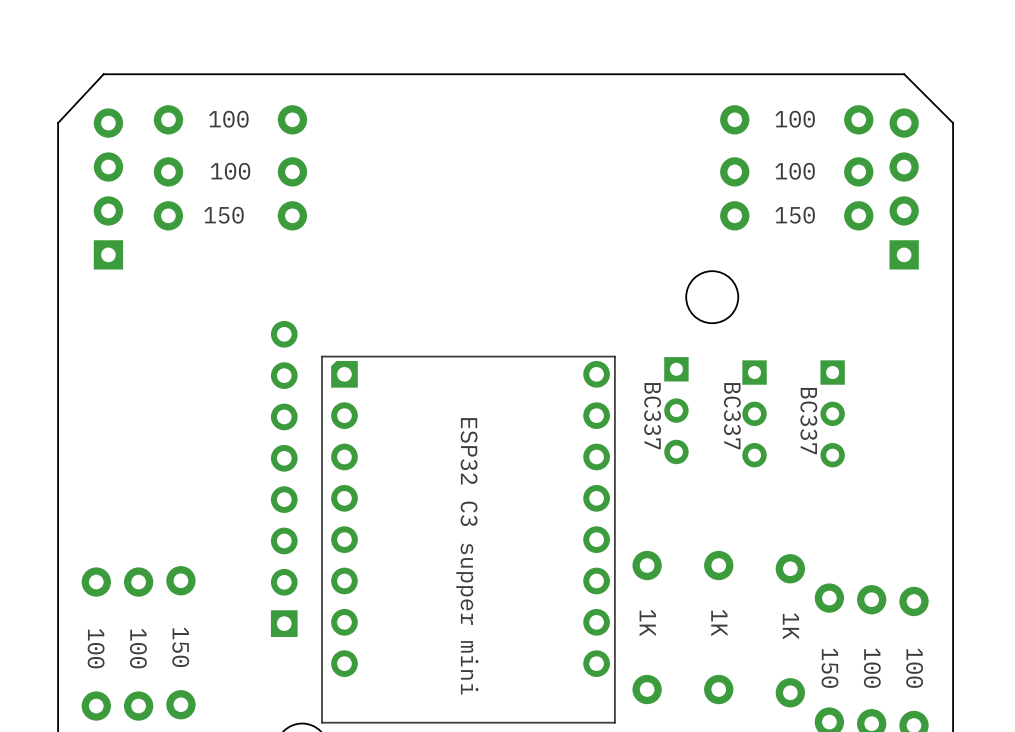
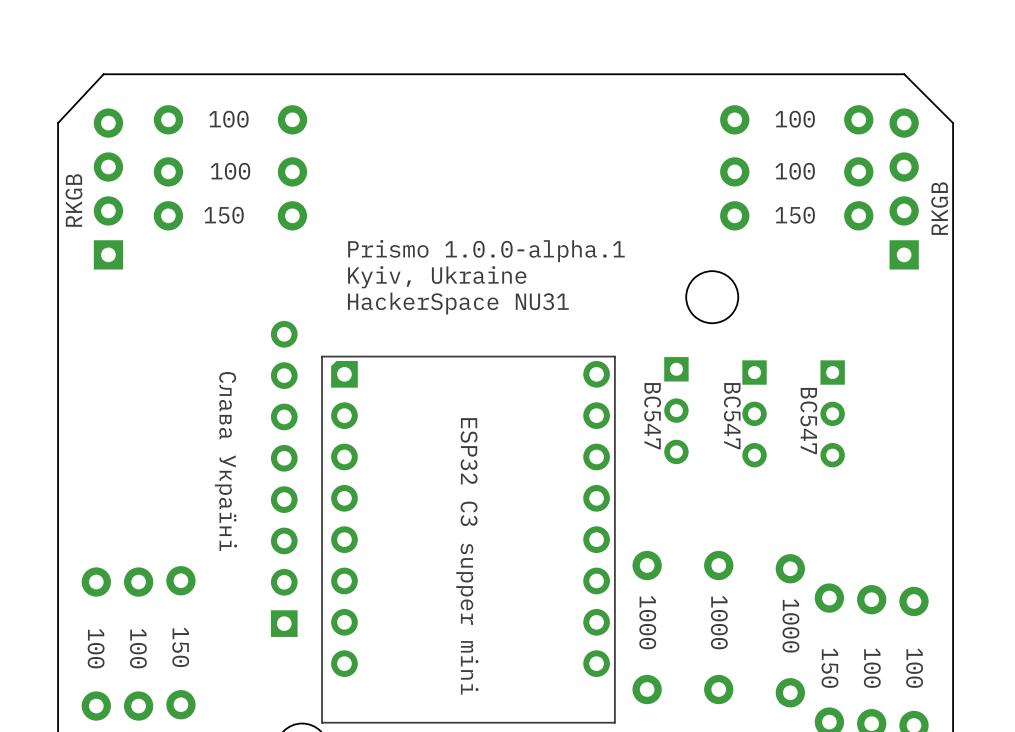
text: none -> RKGB (73, 200)
text: none -> RKGB (939, 208)
text: none -> Prismo 1.0.0-alpha.1 (486, 251)
text: none -> Kyiv, Ukraine (437, 277)
text: none -> HackerSpace NU31 (458, 303)
part value: BC337 (652, 416) -> BC547 (652, 416)
part value: BC337 (732, 416) -> BC547 (732, 416)
part value: BC337 (808, 421) -> BC547 (808, 421)
text: none -> Слава Україні (225, 461)
part value: 1K (647, 623) -> 1000 (647, 622)
part value: 1K (719, 623) -> 1000 (719, 622)
part value: 1K (790, 626) -> 1000 (790, 625)

